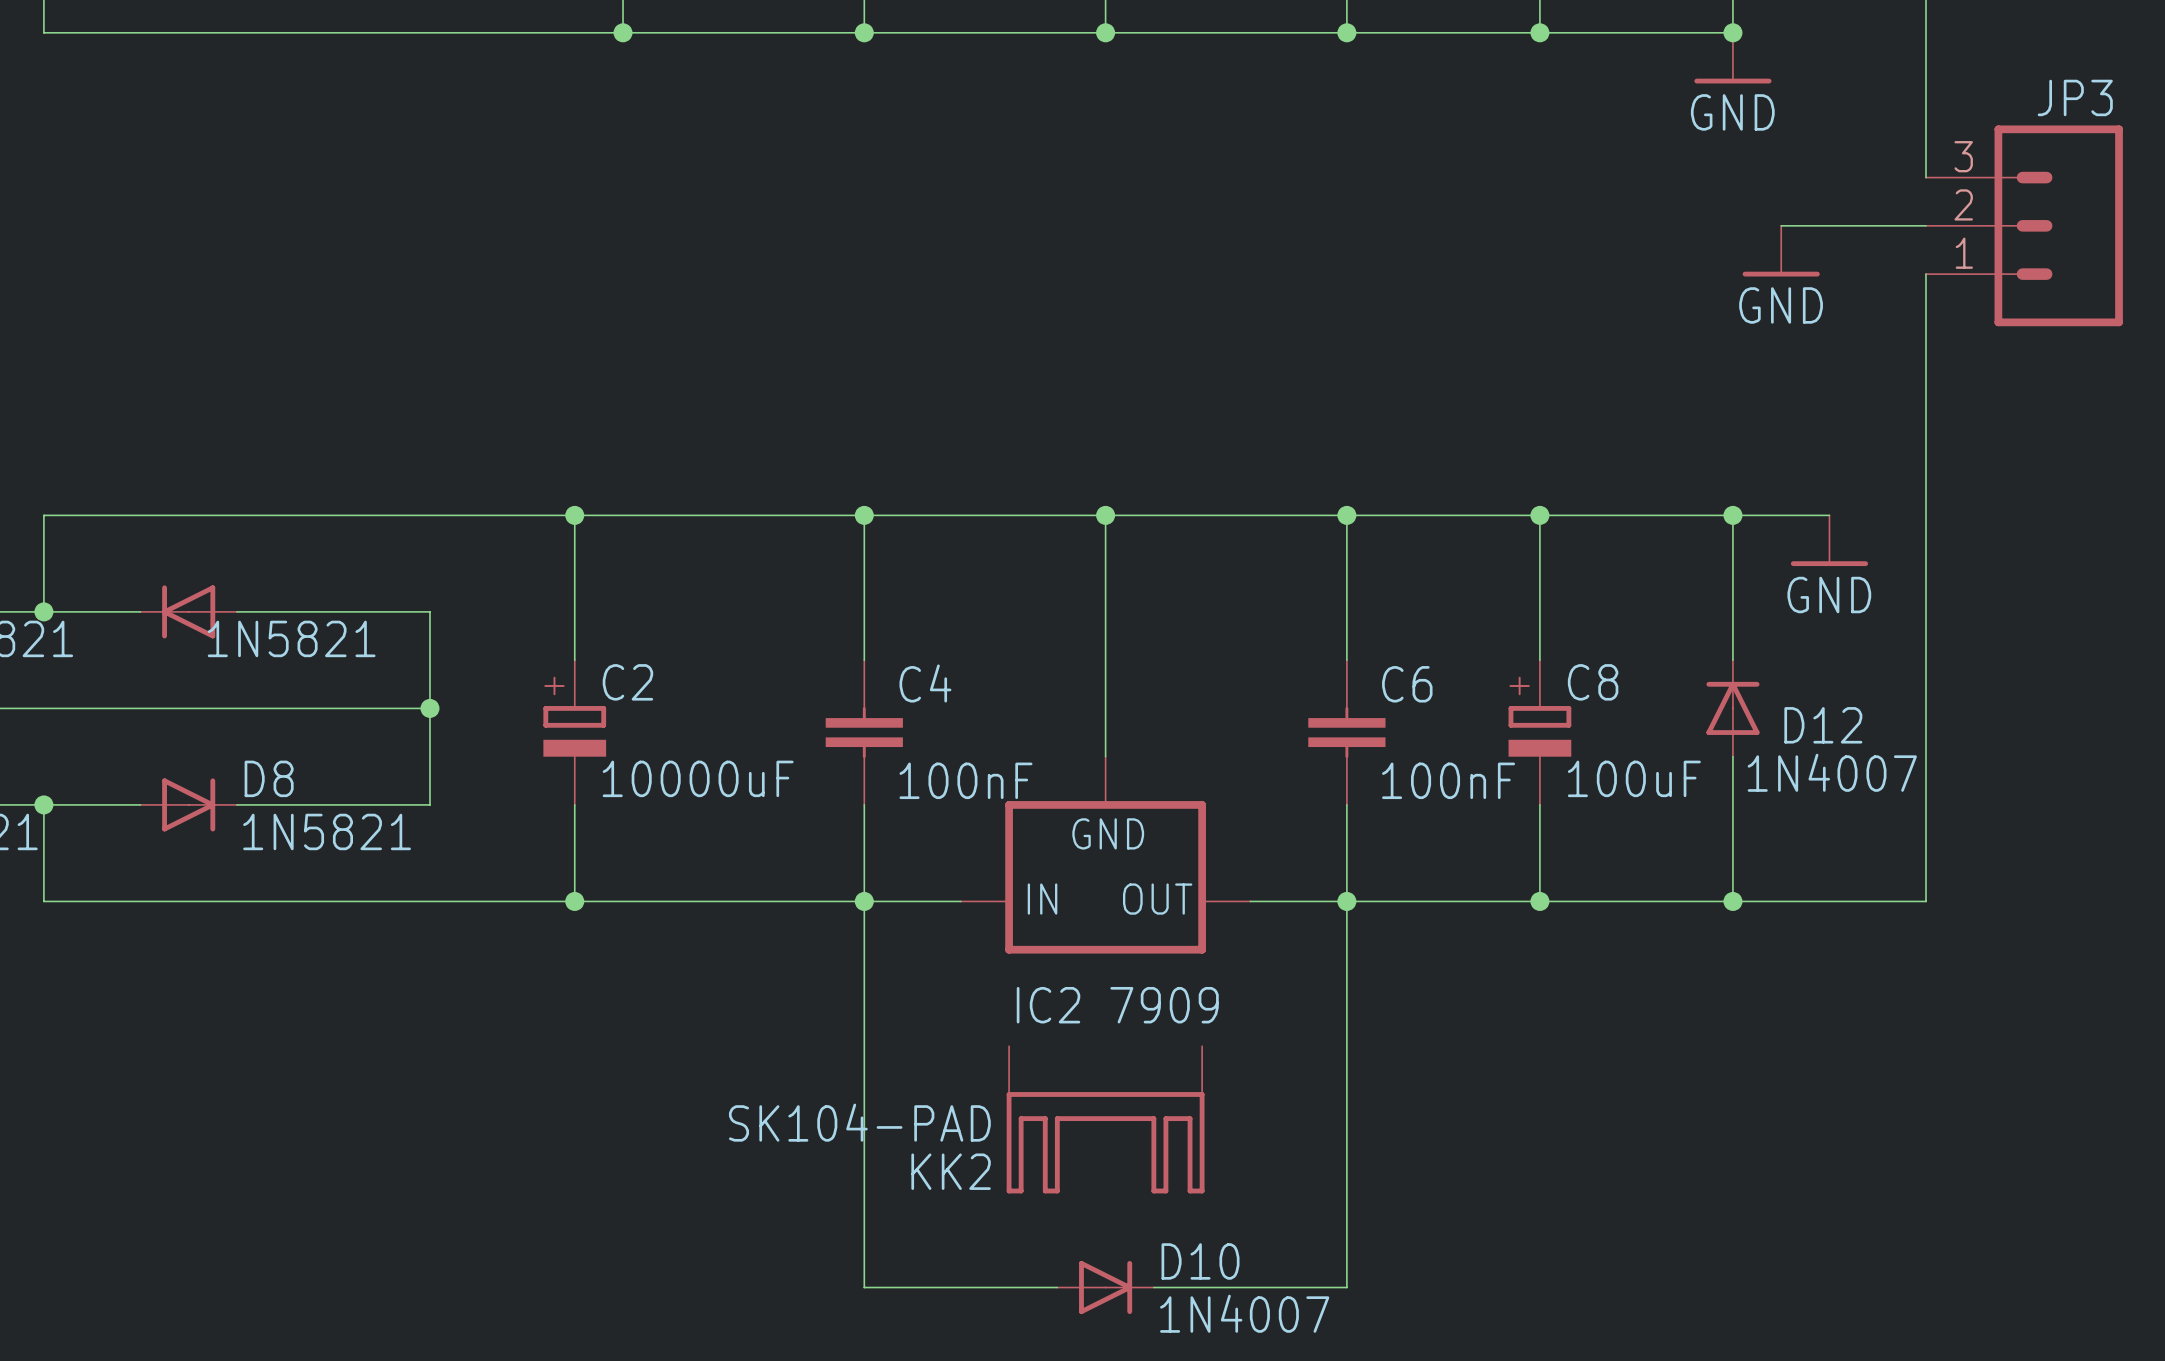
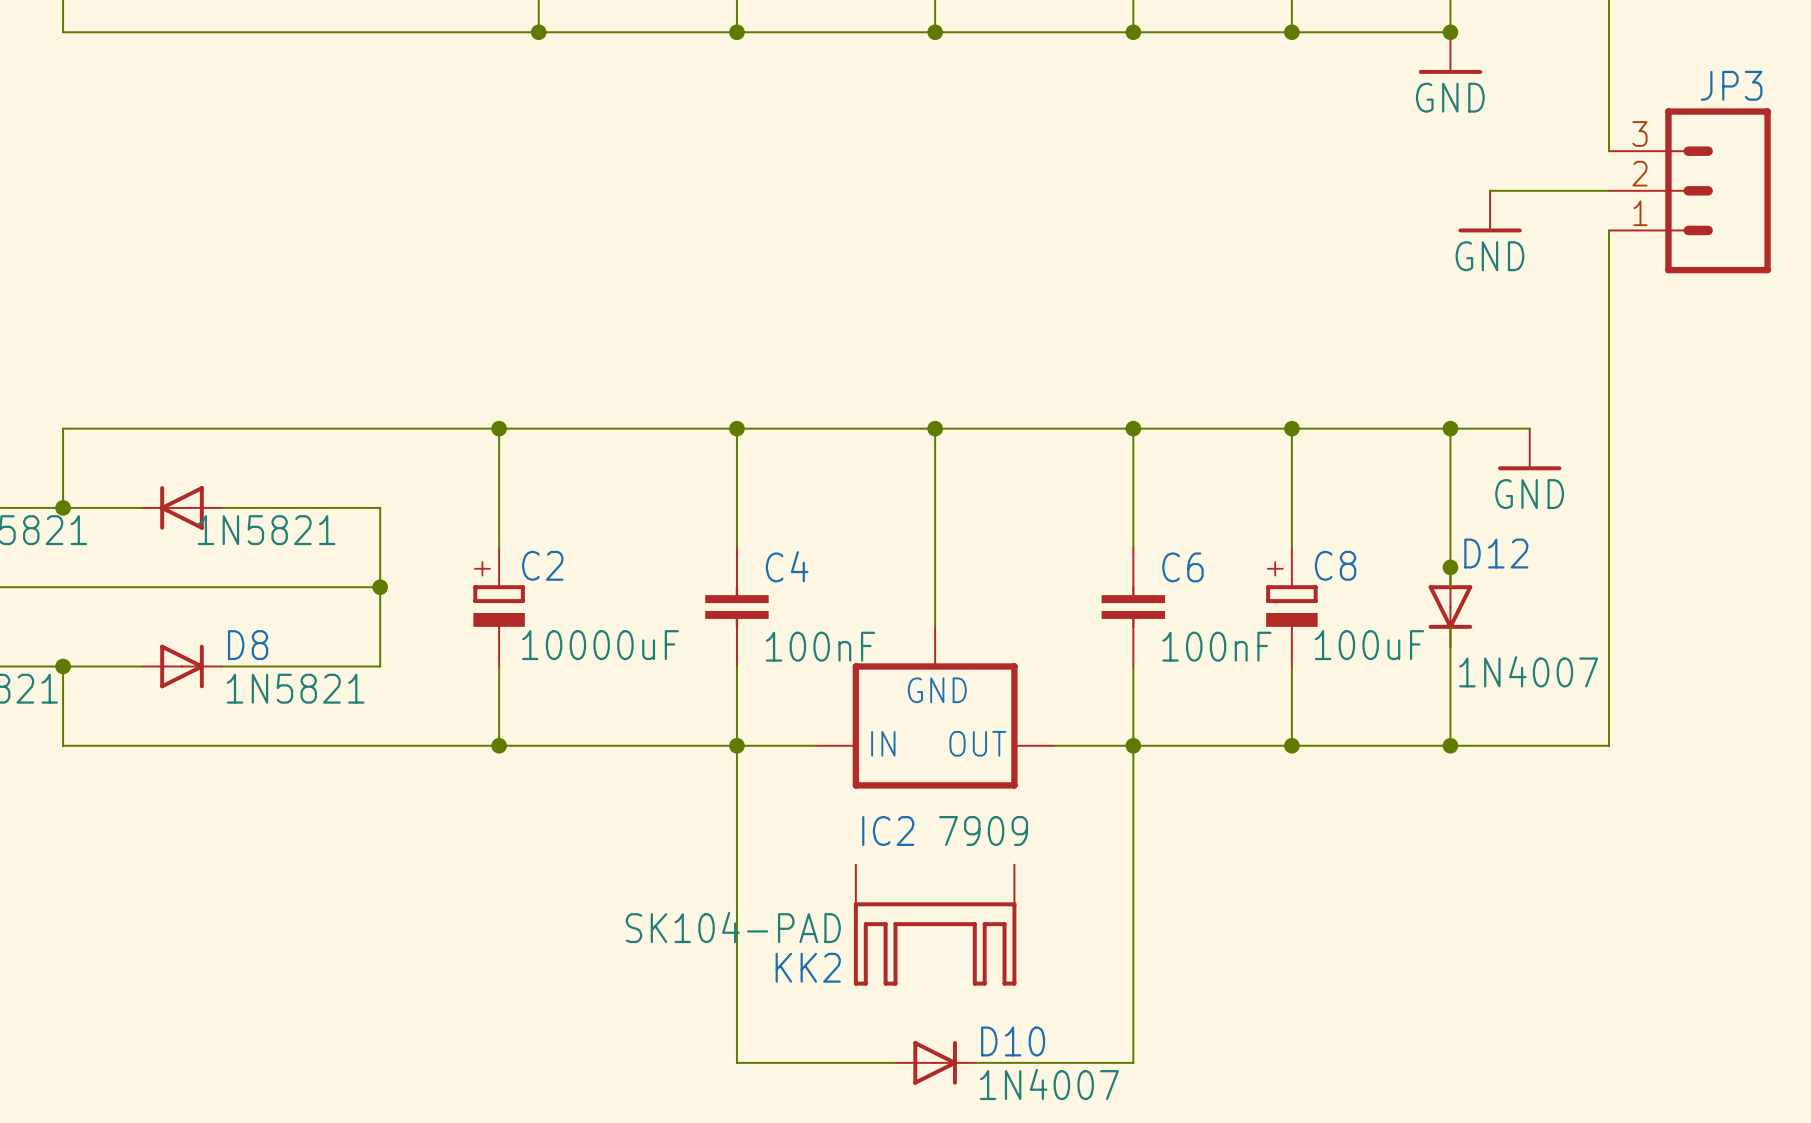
junction: none -> (1450, 567)
D12 rotation: 0° (1732, 708) -> 180° (1450, 607)
D12 name position: D12 (1823, 725) -> D12 (1496, 553)

